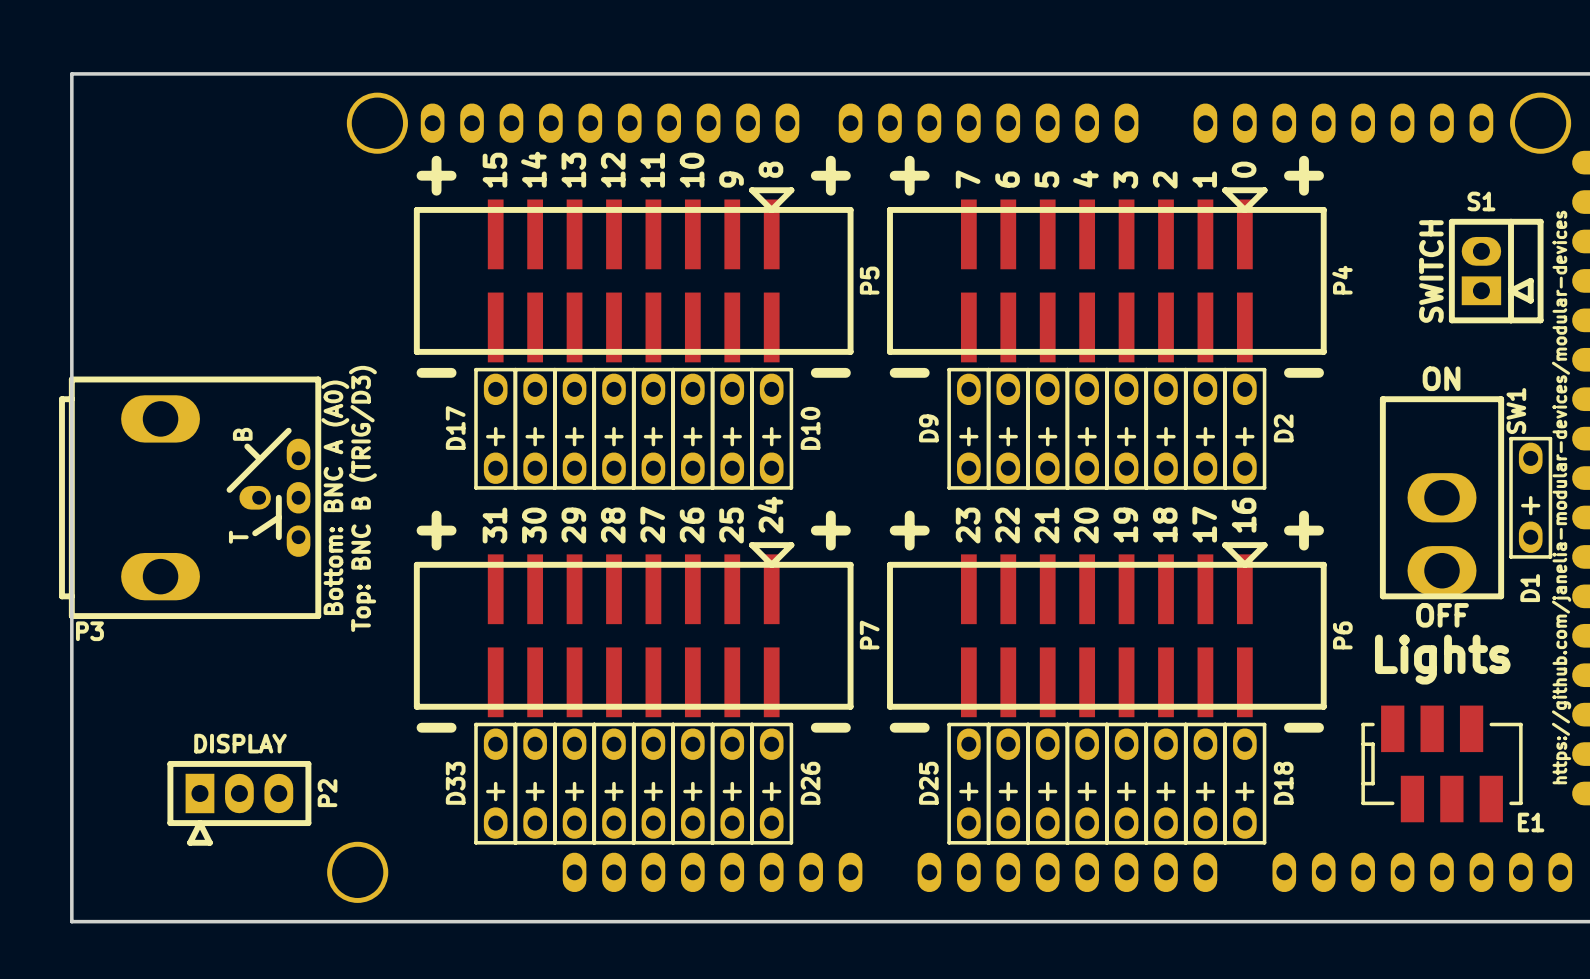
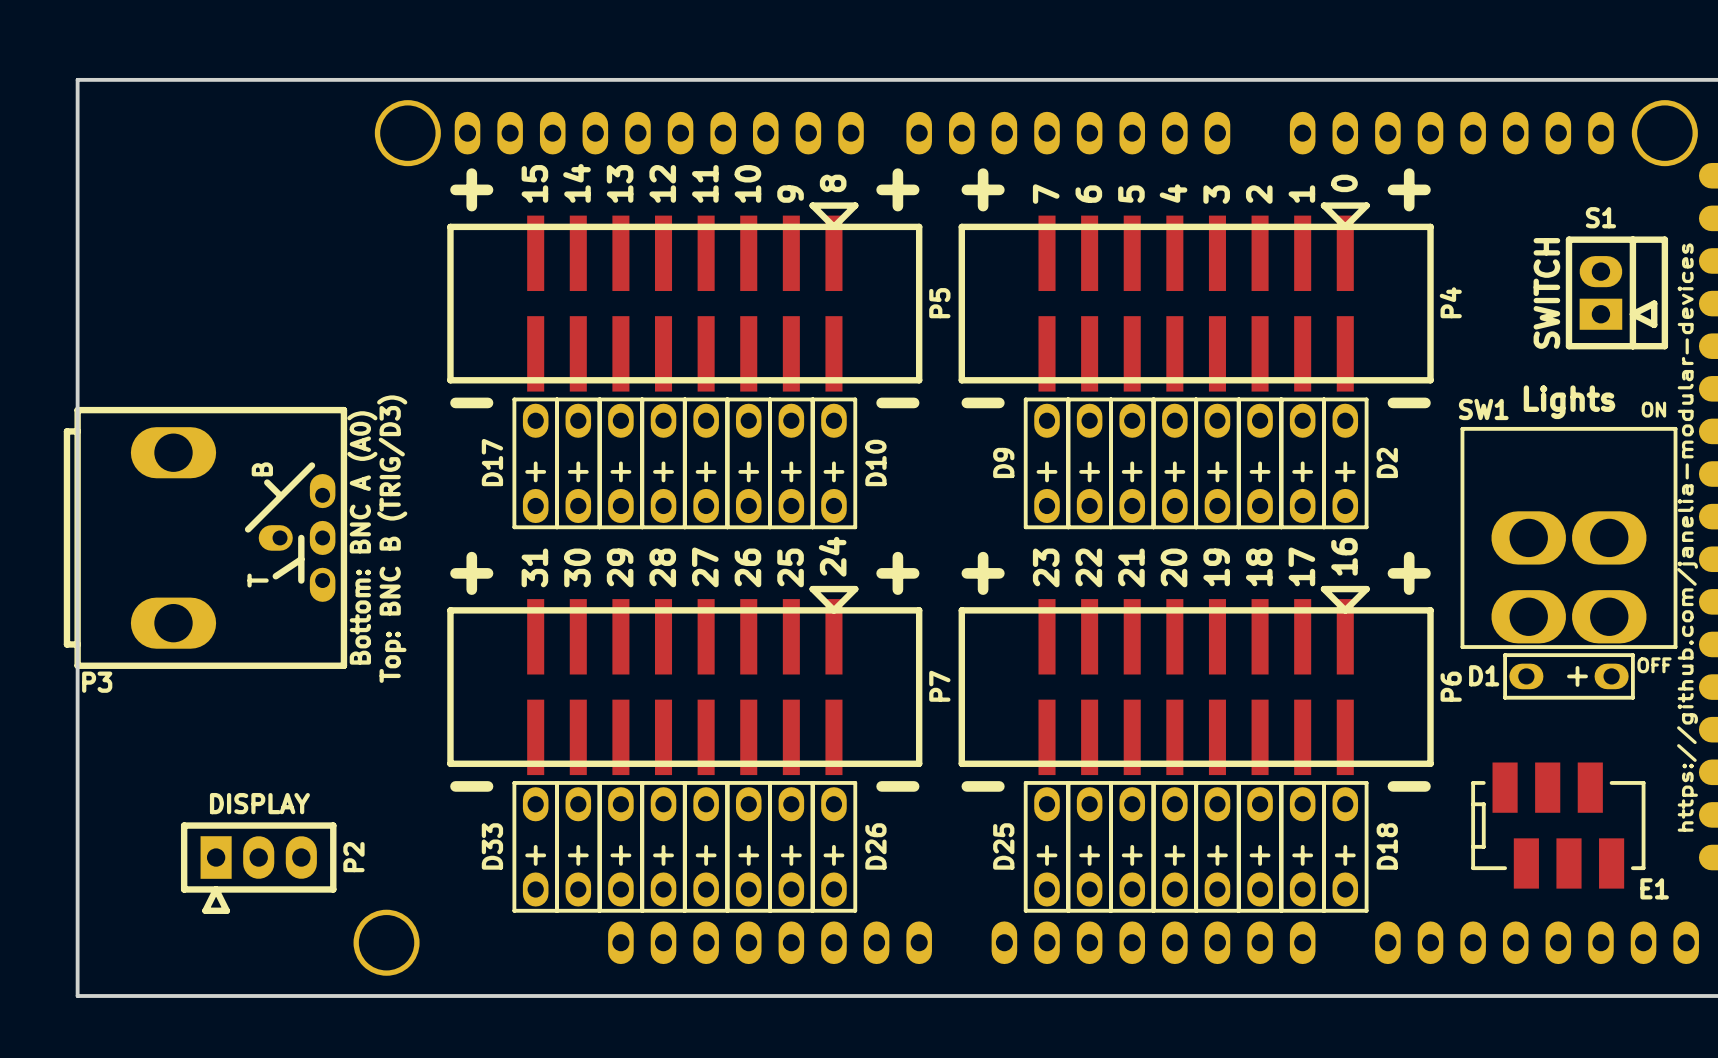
SW1 footprint: [1379, 396, 1505, 600] -> [1460, 426, 1678, 649]
SW1 name position: SW1 (1516, 411) -> SW1 (1483, 409)
D1 rotation: 0° (1530, 497) -> 90° counterclockwise (1568, 676)
D1 position: (1530, 497) -> (1568, 676)
text: https://github.com/janelia-modular-devices/modular-devices (1561, 497) -> https://github.com/janelia-modular-devices (1687, 537)
D1 name position: D1 (1530, 588) -> D1 (1484, 675)

